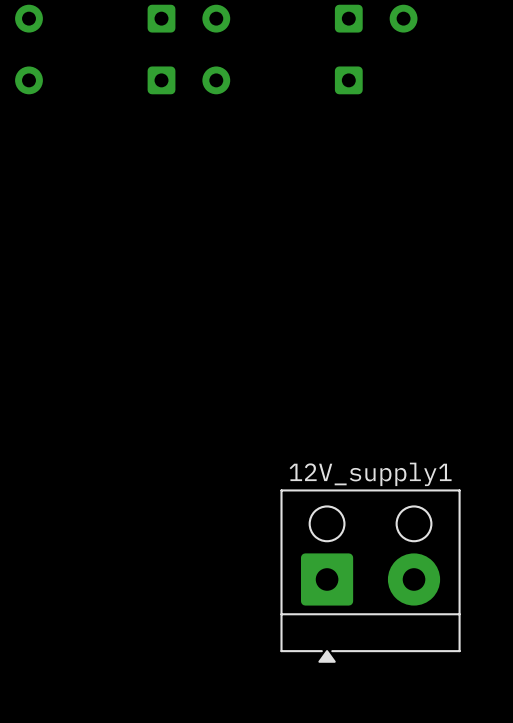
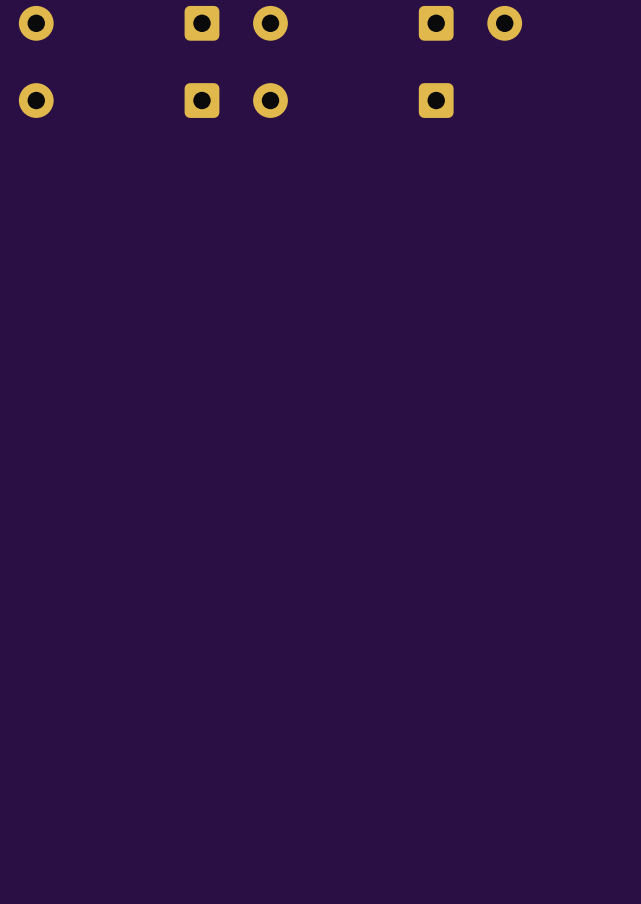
12V_supply1: (370, 576) -> none

